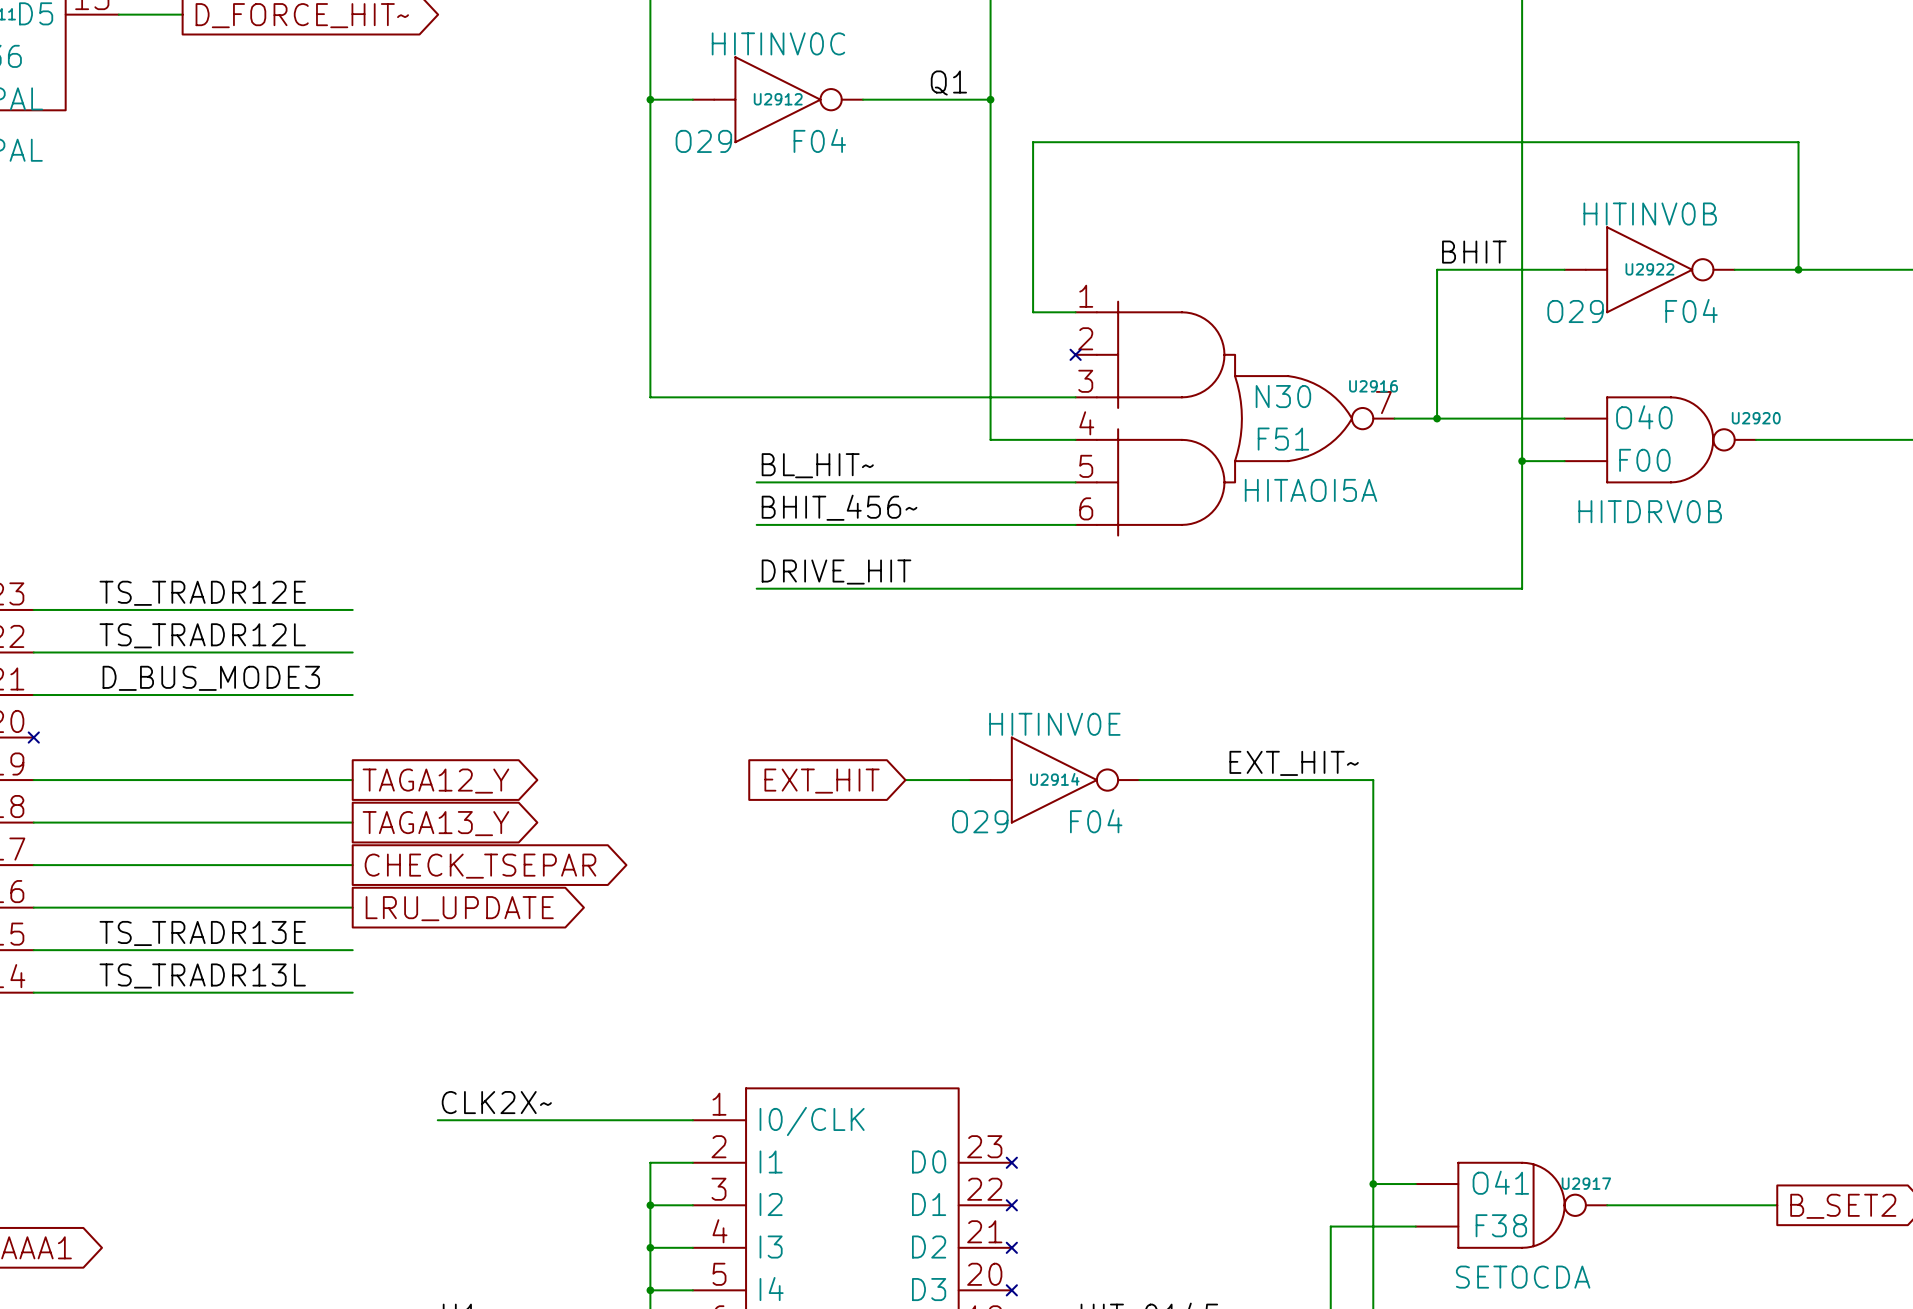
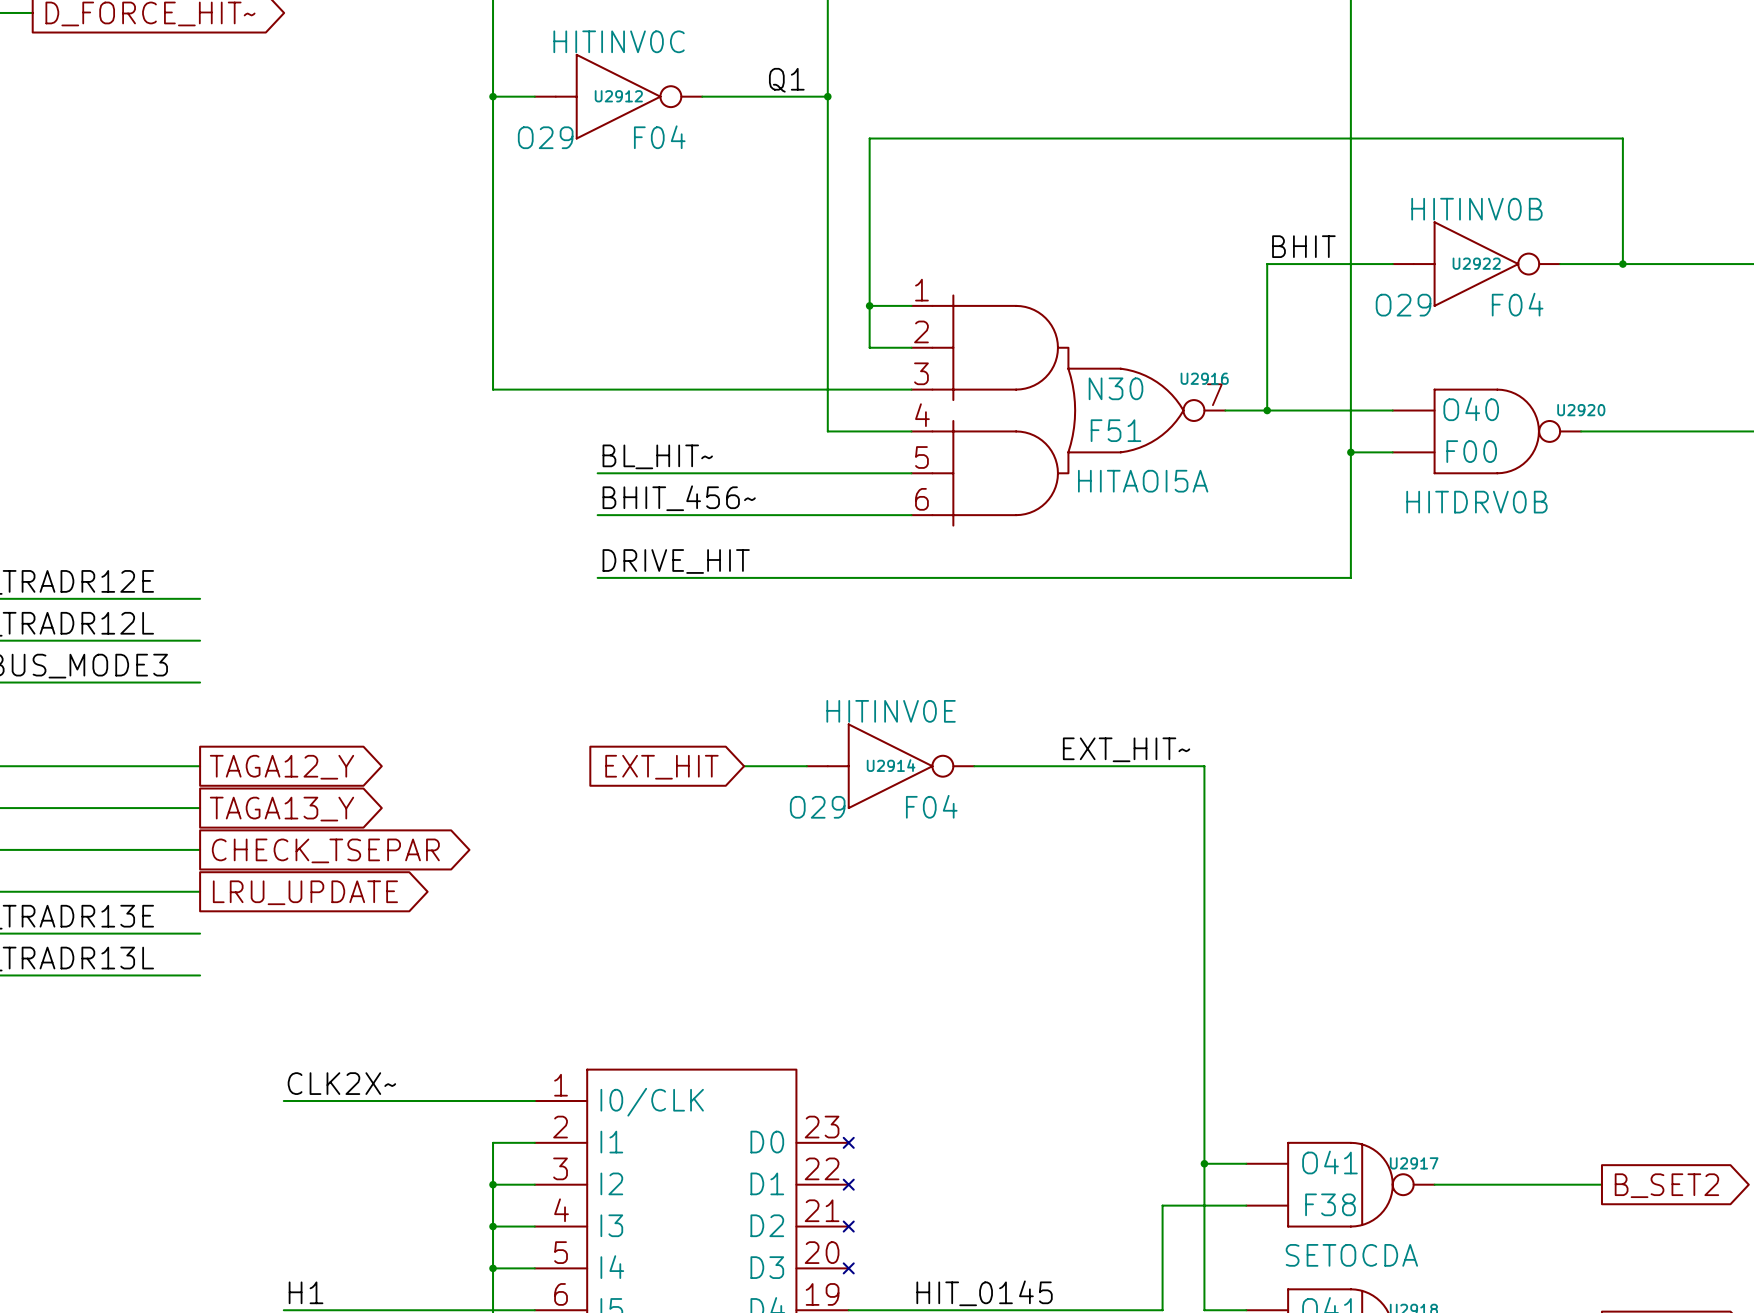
wire: none -> (869, 305) (869, 347) (911, 347)
junction: none -> (869, 305)
no-connect mark: (1075, 354) -> none

